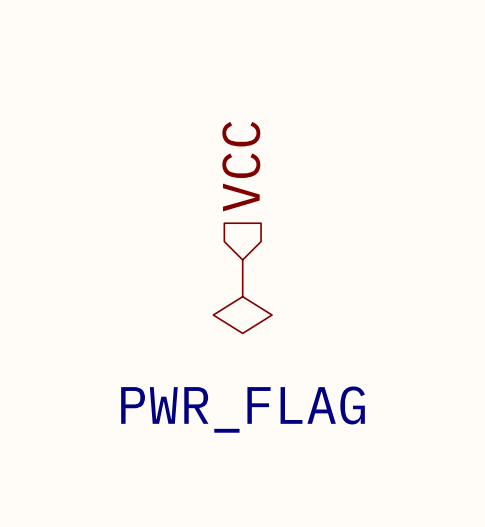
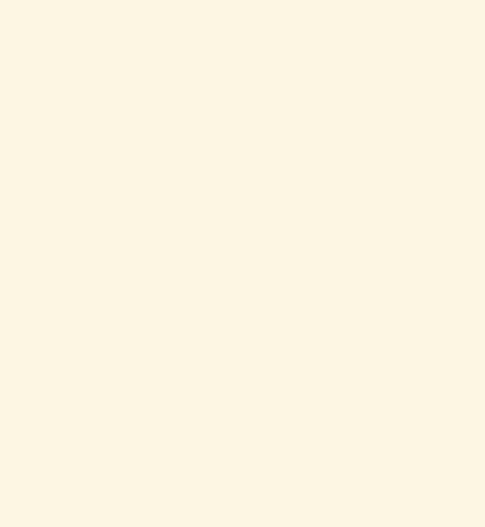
hierarchical label: VCC (241, 166) -> none
power symbol: PWR_FLAG (242, 296) -> none

